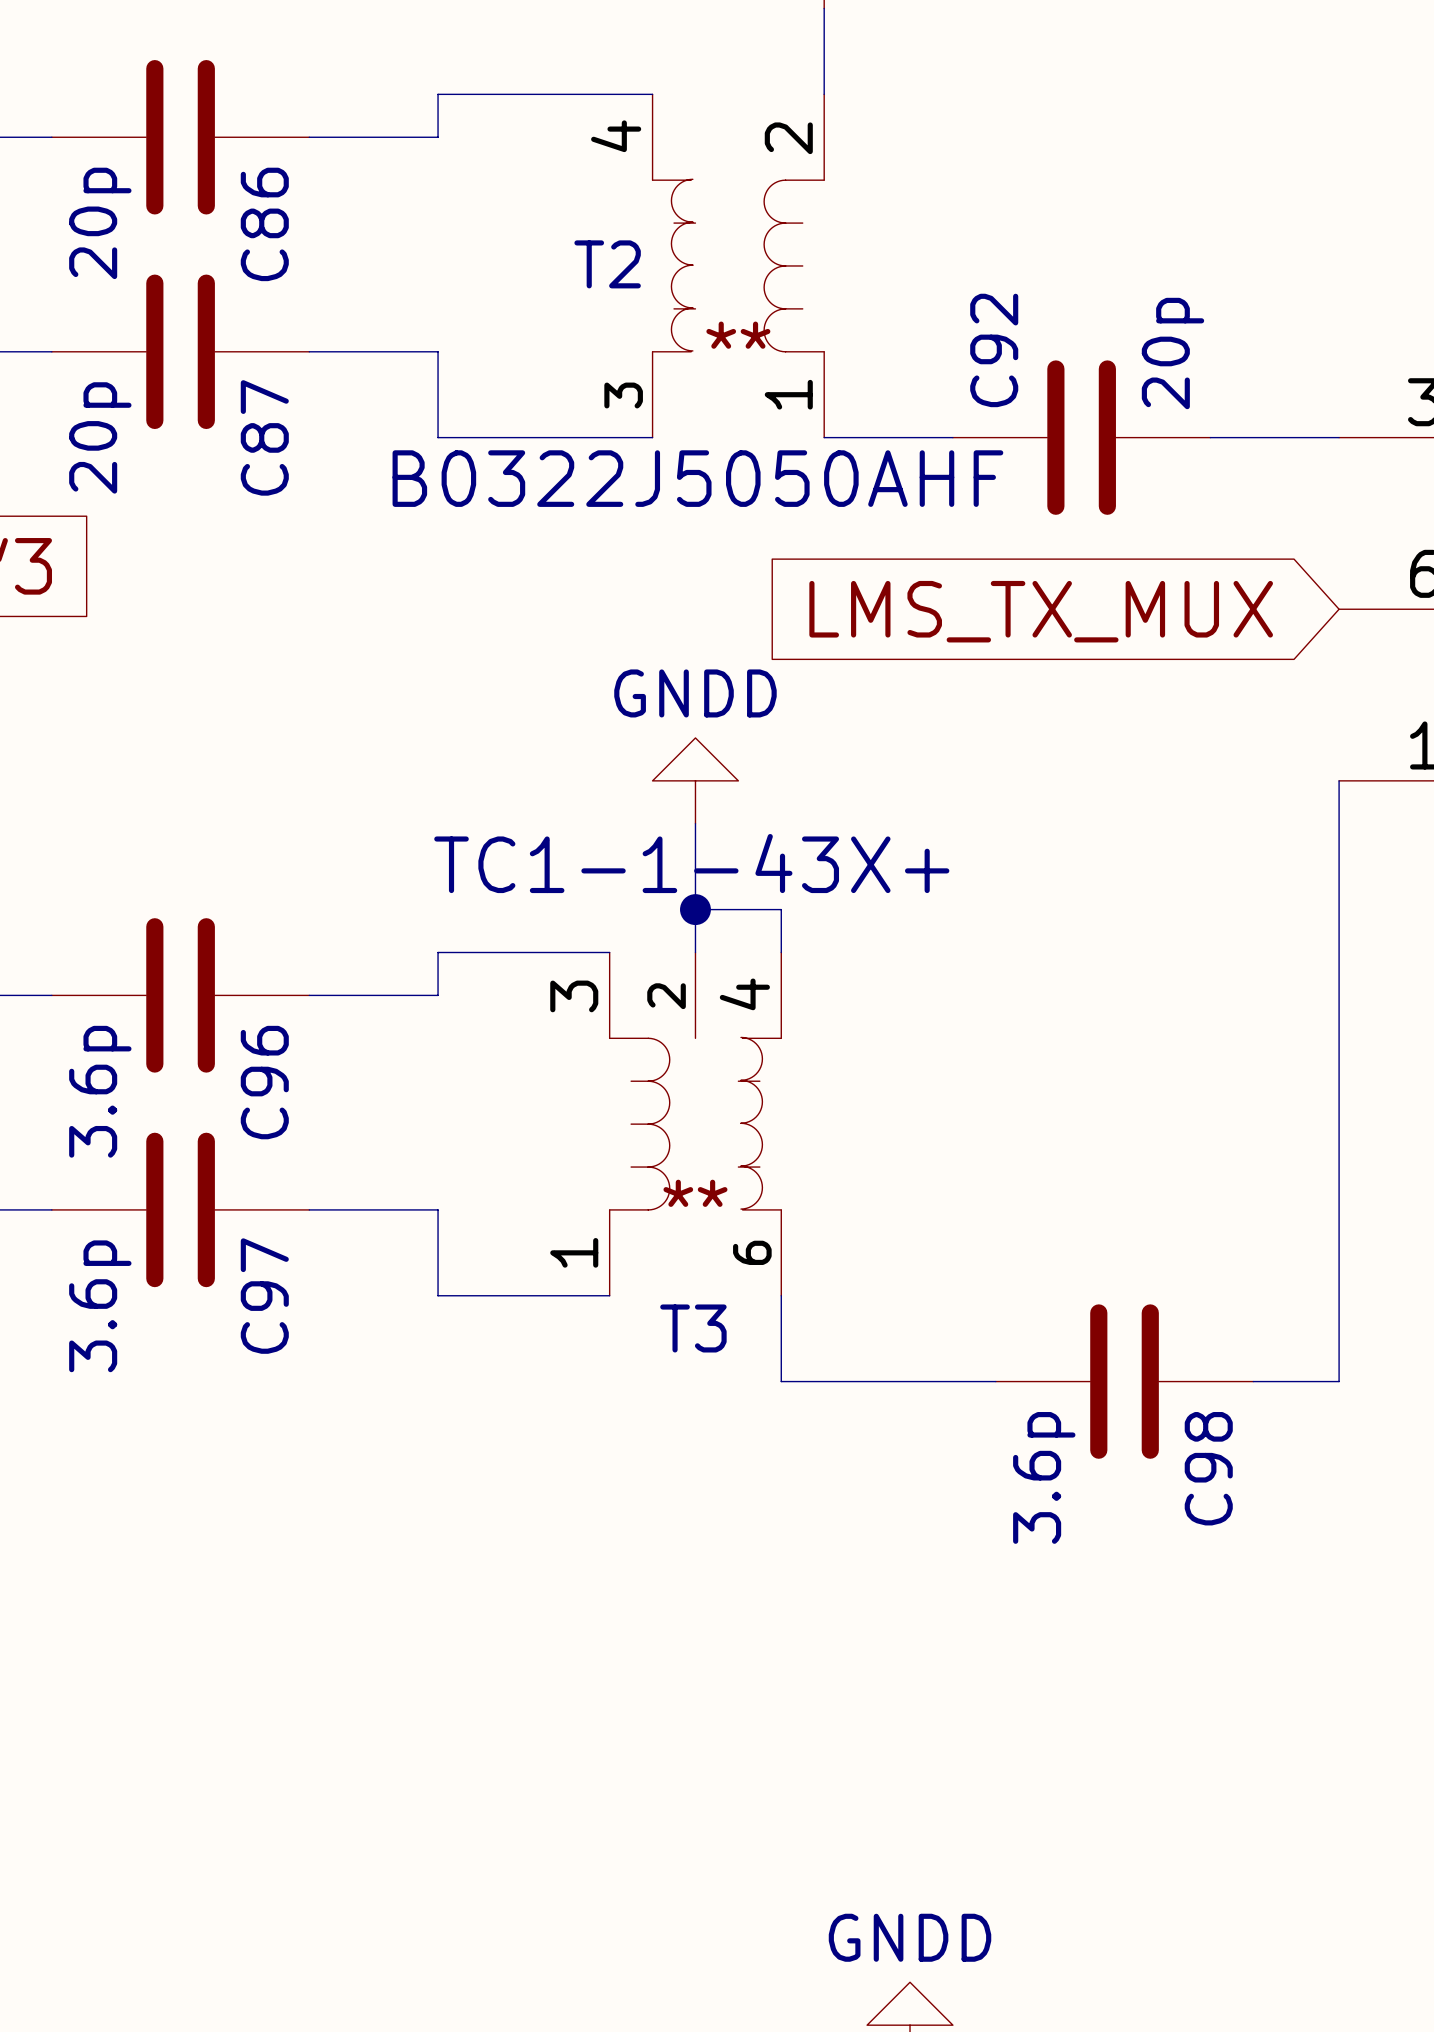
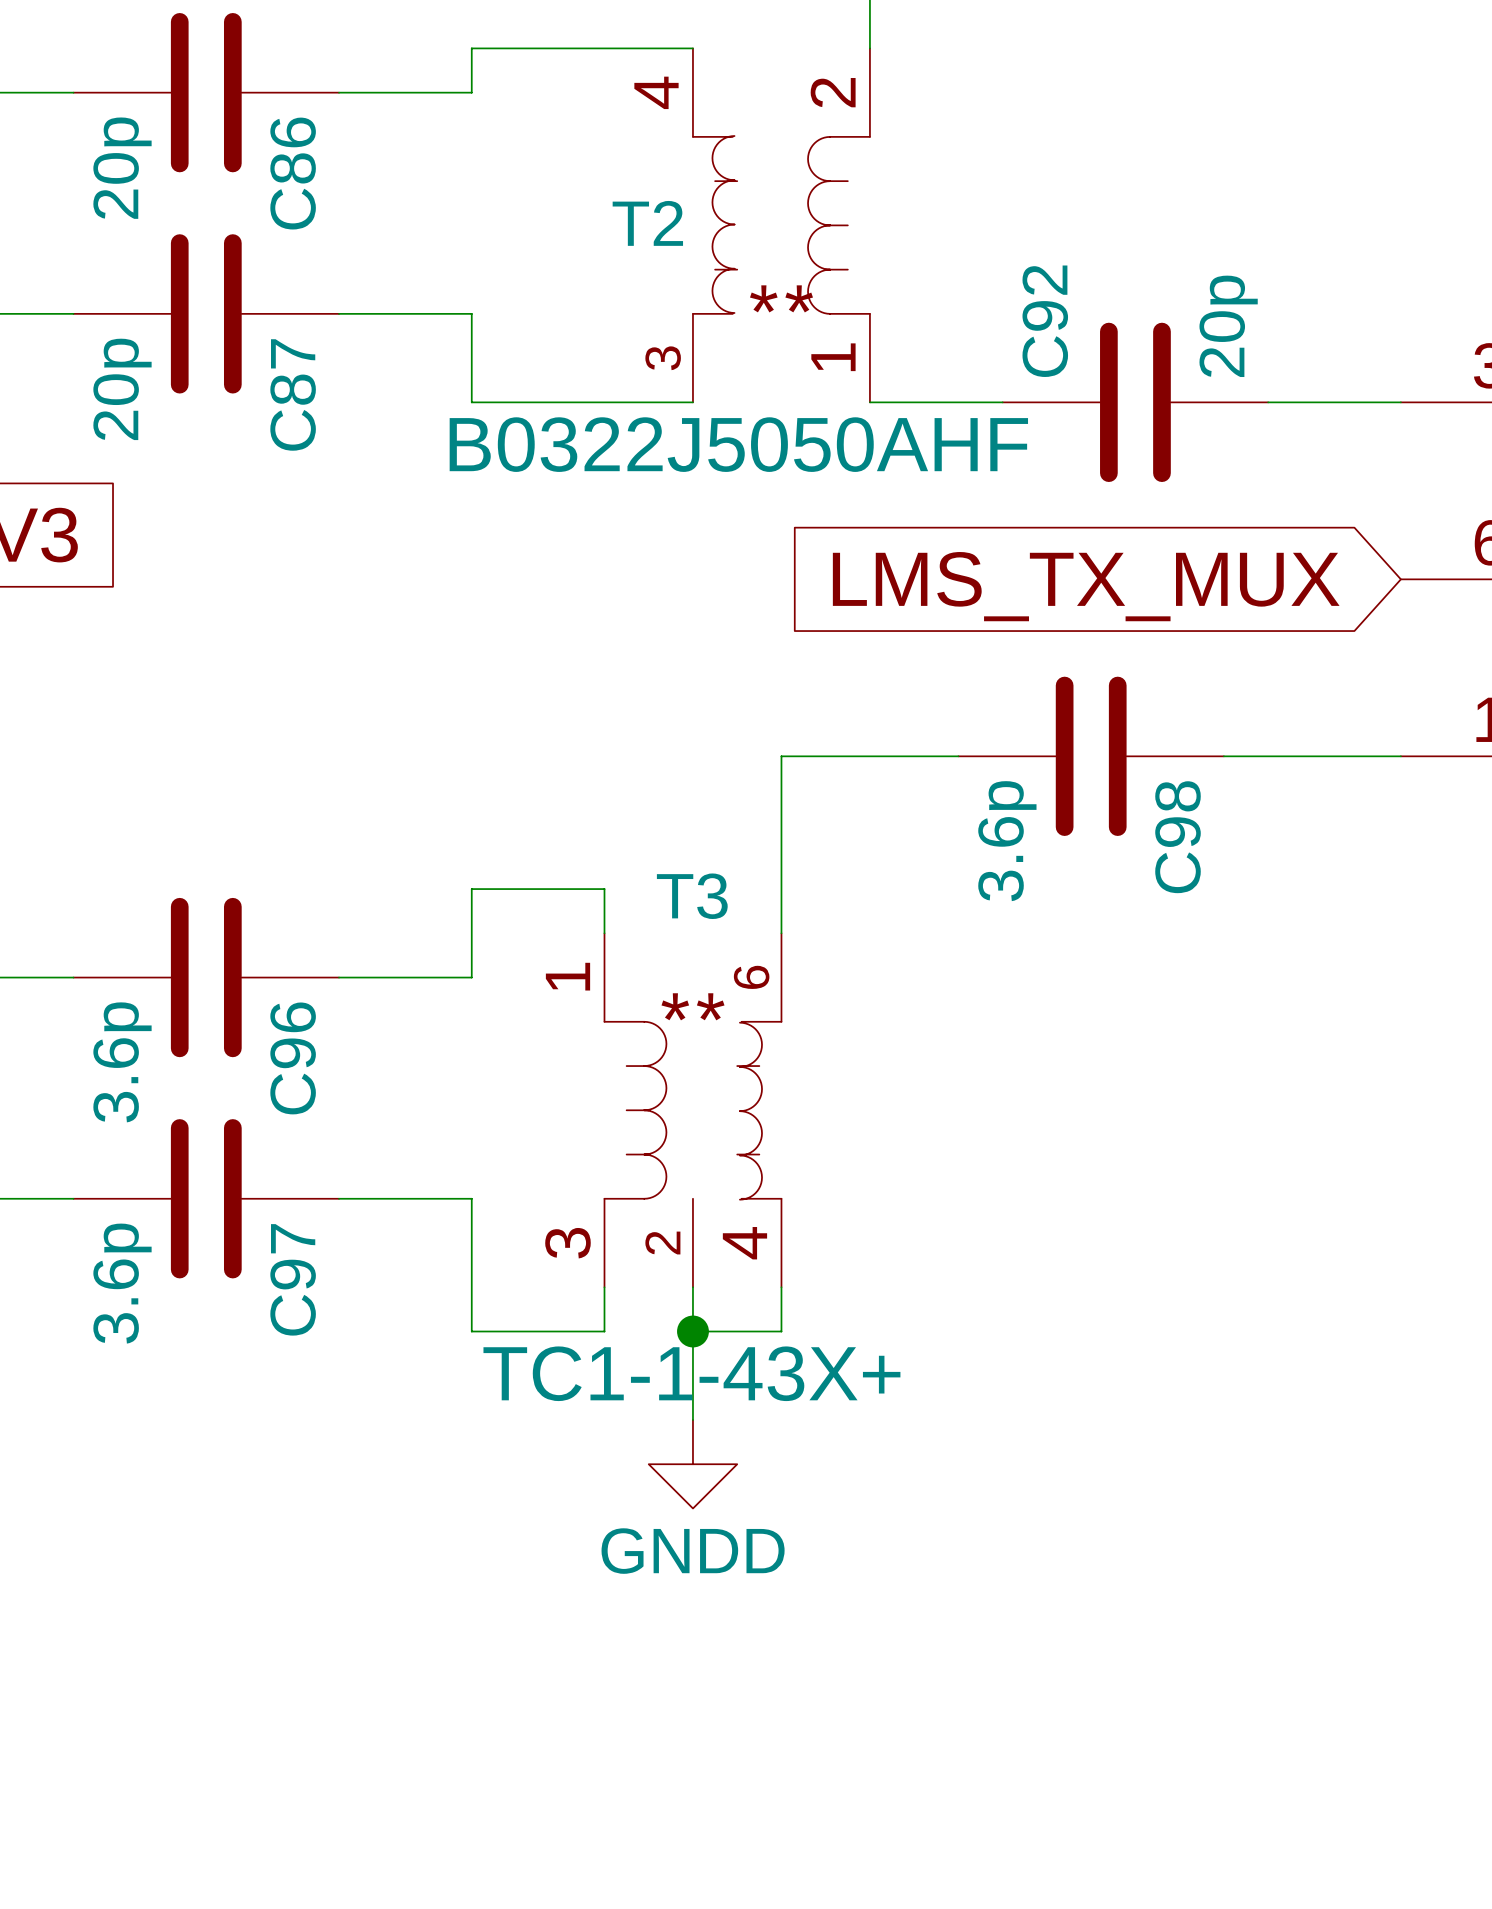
power symbol rotation: 0° (695, 780) -> 180° (692, 1464)
power symbol position: GNDD (695, 780) -> GNDD (692, 1464)
wire: none -> (958, 756) (781, 756) (781, 933)
wire: (1339, 780) (1339, 1381) (1253, 1381) -> (1400, 756) (1223, 756)
wire: (695, 823) (695, 952) -> (692, 1287) (692, 1419)
wire: (695, 909) (781, 909) (781, 952) -> none
junction: (695, 909) -> none
wire: (438, 952) (609, 952) -> (471, 933) (471, 889) (604, 889) (604, 933)
T3 flip: as is (695, 1123) -> up-down (692, 1110)
wire: (438, 1295) (609, 1295) -> (471, 1287) (471, 1331) (604, 1331) (604, 1287)
wire: none -> (781, 1287) (781, 1331) (692, 1331)
wire: (781, 1295) (781, 1381) (995, 1381) -> none
junction: none -> (692, 1331)
C98 position: (1124, 1381) -> (1091, 756)

